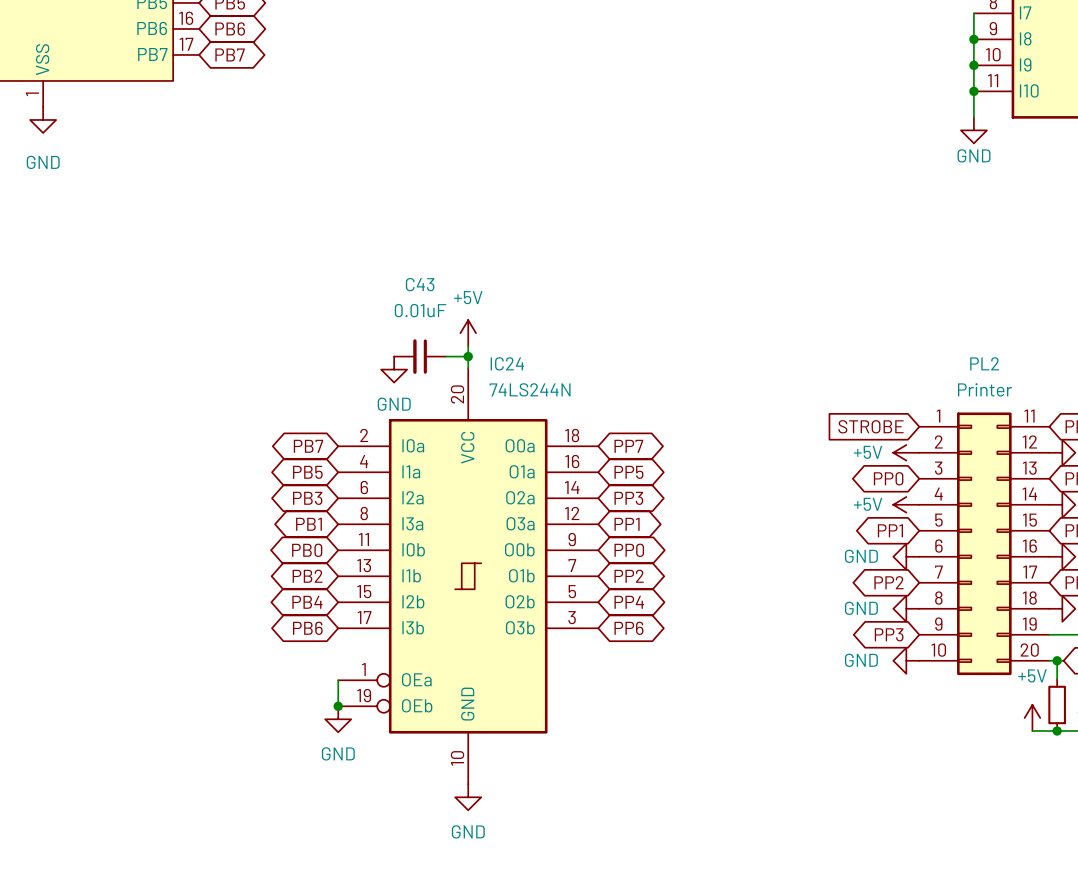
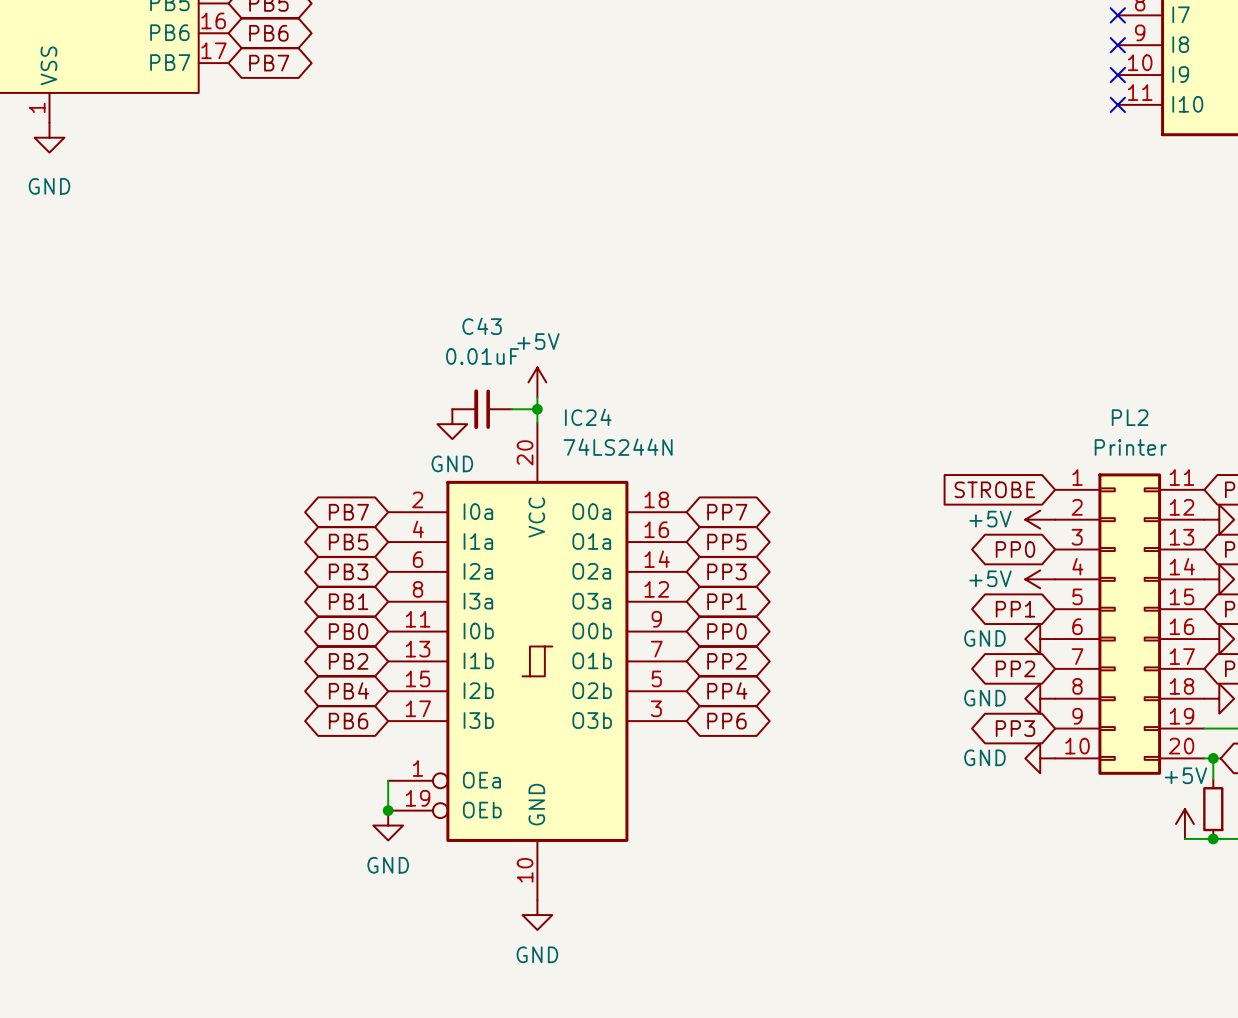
wire: (973, 13) (973, 117) -> none
no-connect mark: none -> (1117, 15)
junction: (973, 39) -> none
no-connect mark: none -> (1117, 45)
junction: (973, 65) -> none
no-connect mark: none -> (1117, 75)
junction: (973, 91) -> none
no-connect mark: none -> (1117, 104)
power symbol: GND (973, 130) -> none

